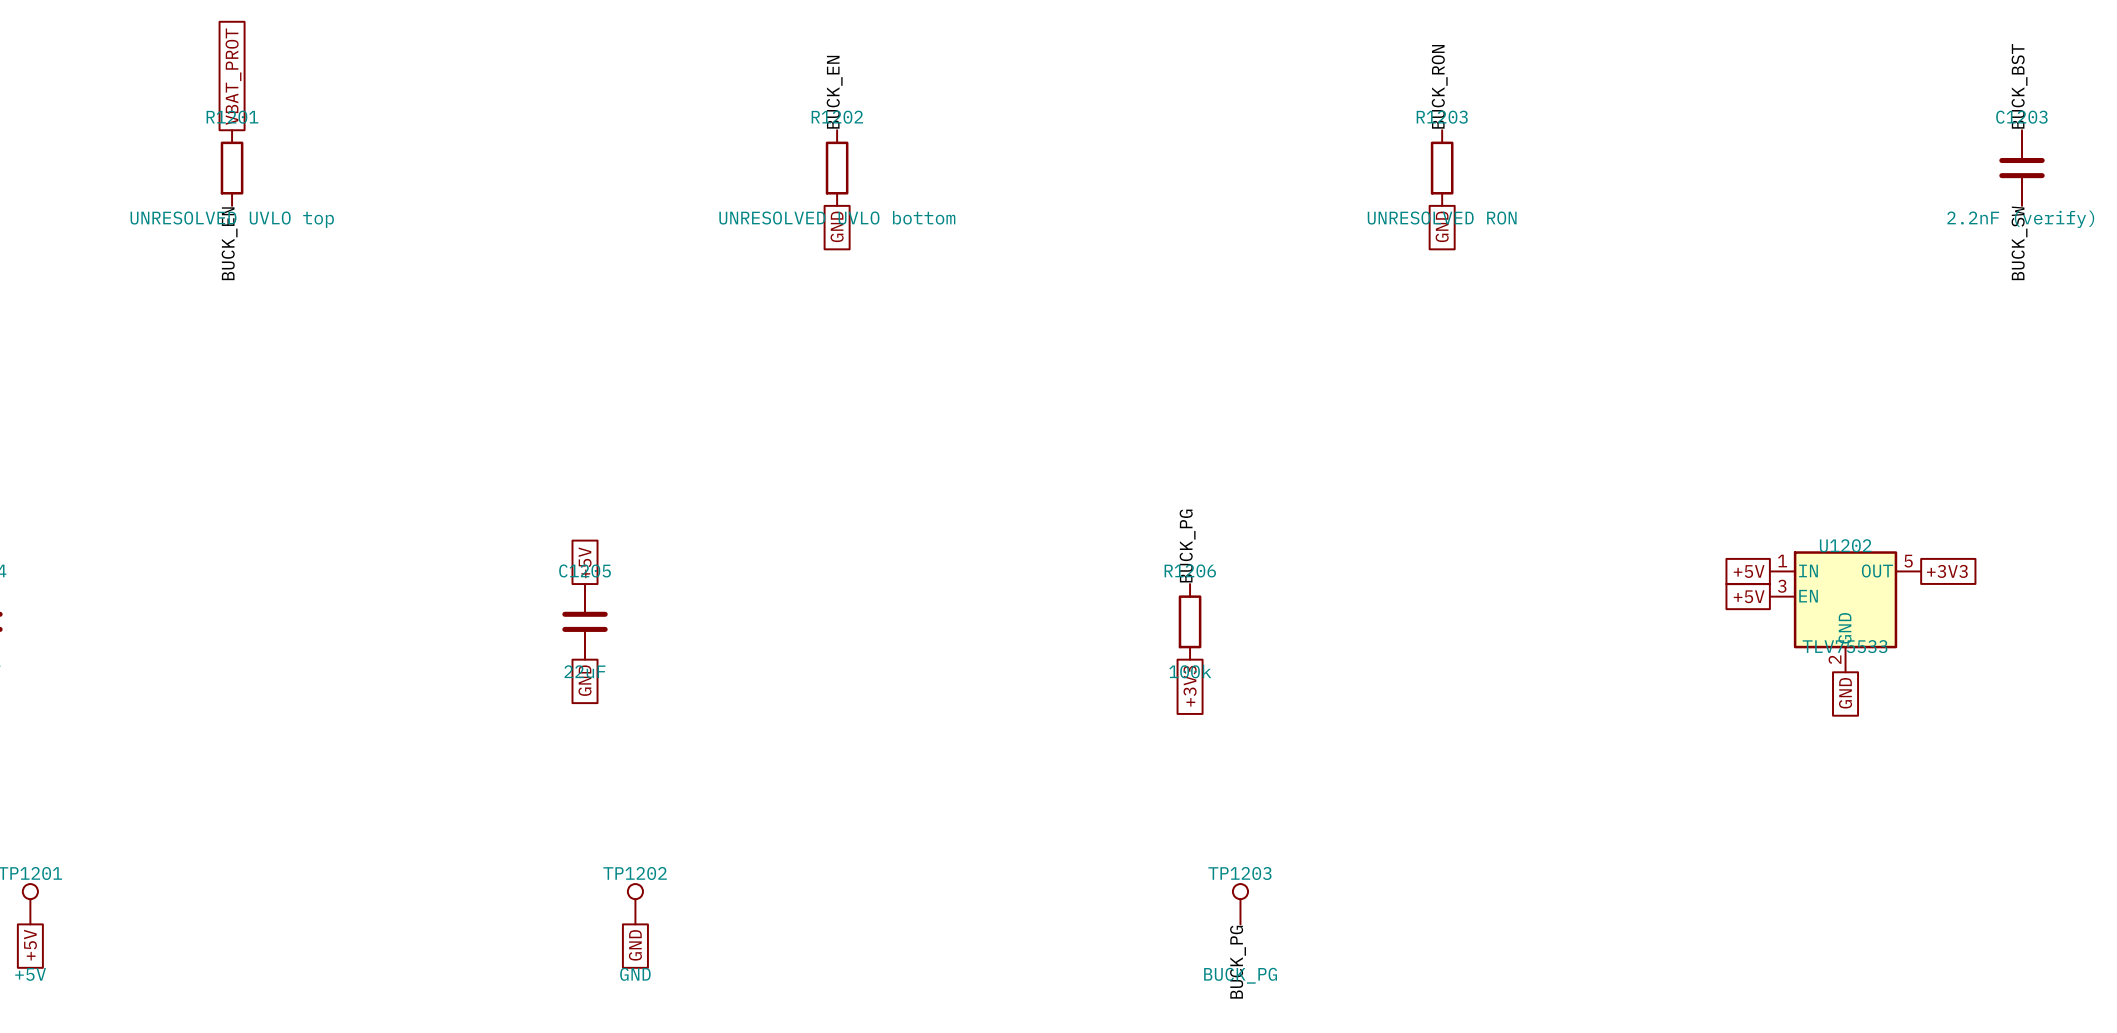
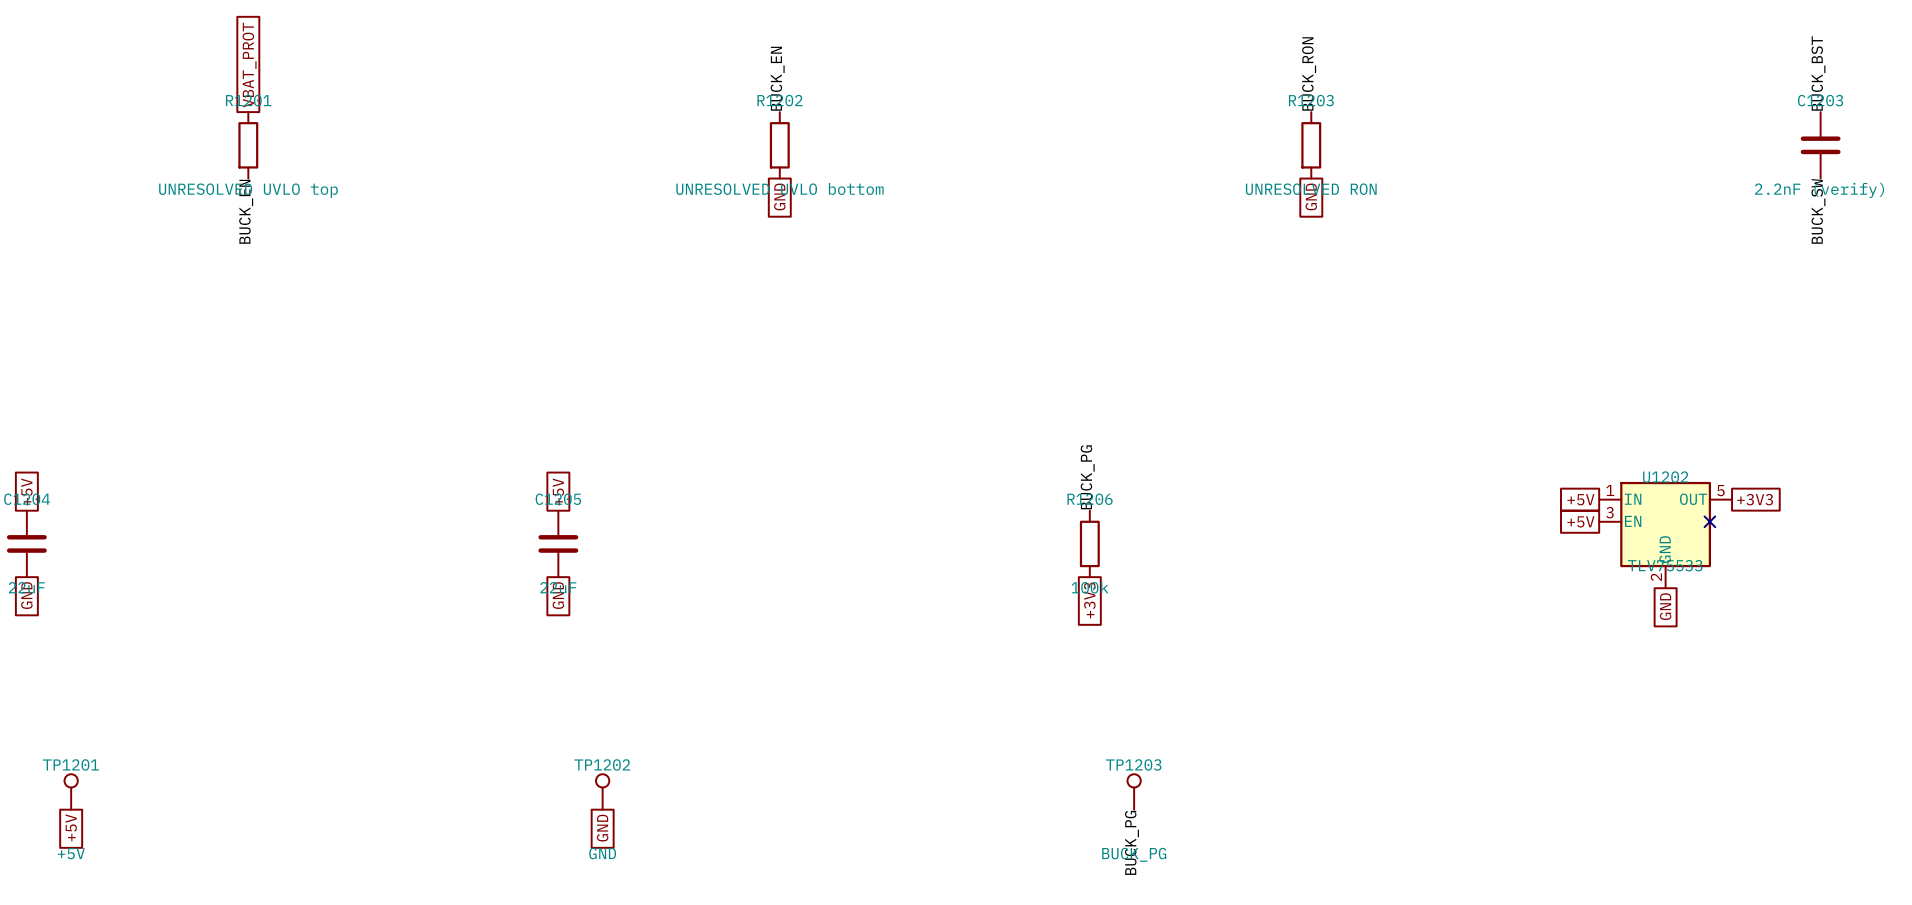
no-connect mark: none -> (1709, 521)

